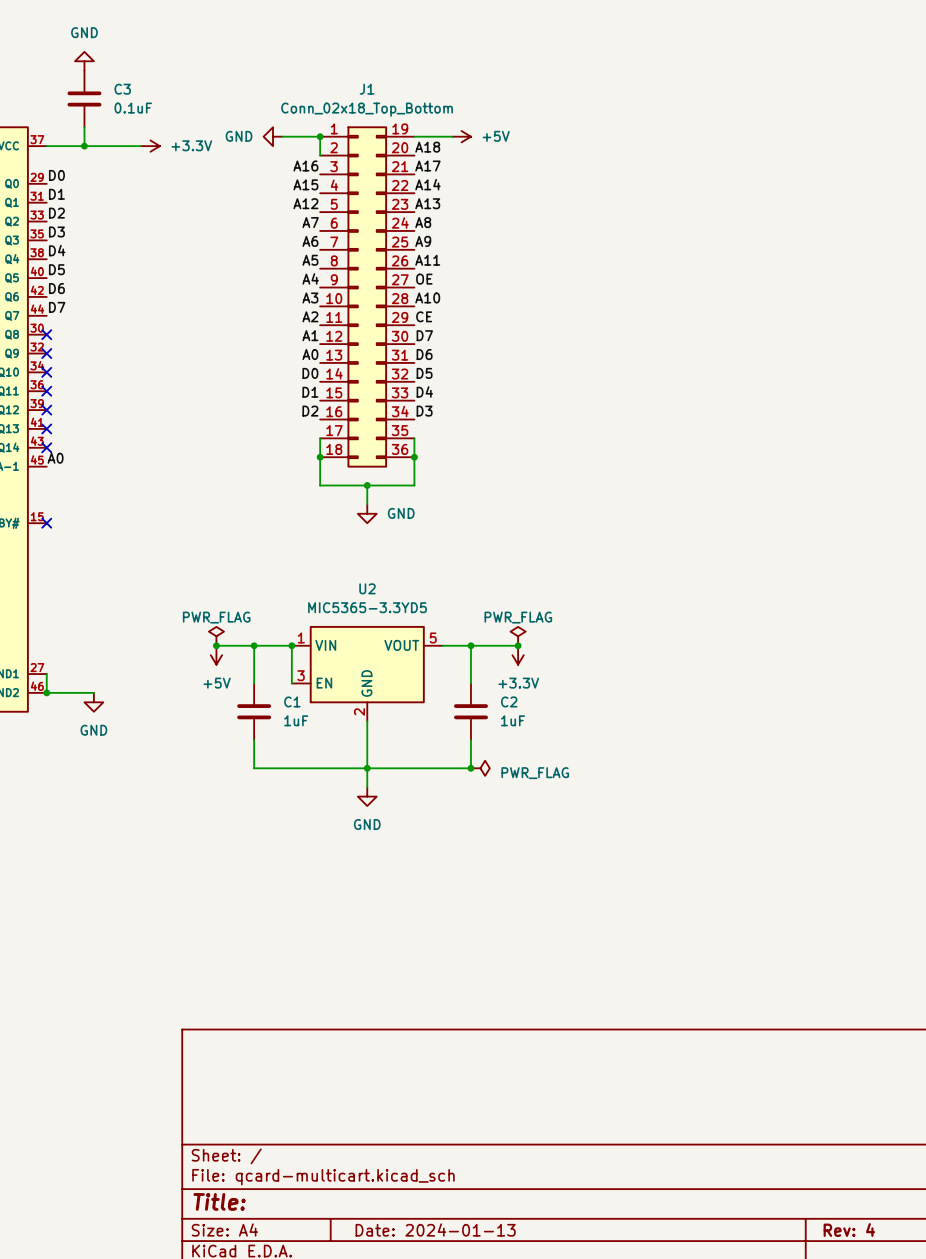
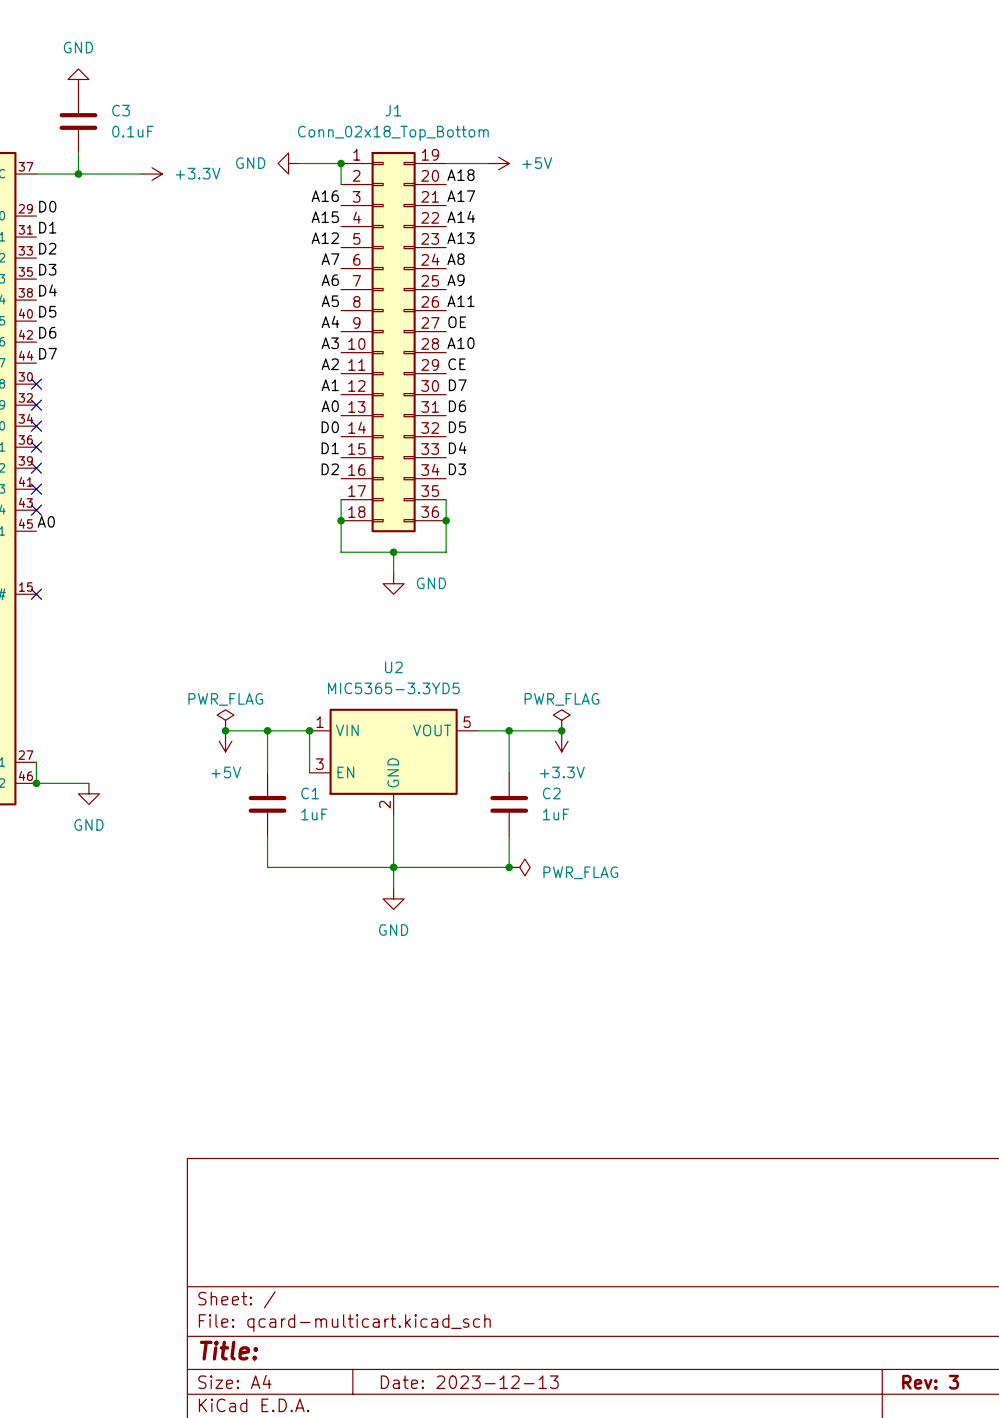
title block: Date: 2024-01-13 (435, 1230) -> Date: 2023-12-13 (469, 1382)
title block: Rev: 4 (849, 1230) -> Rev: 3 (930, 1382)

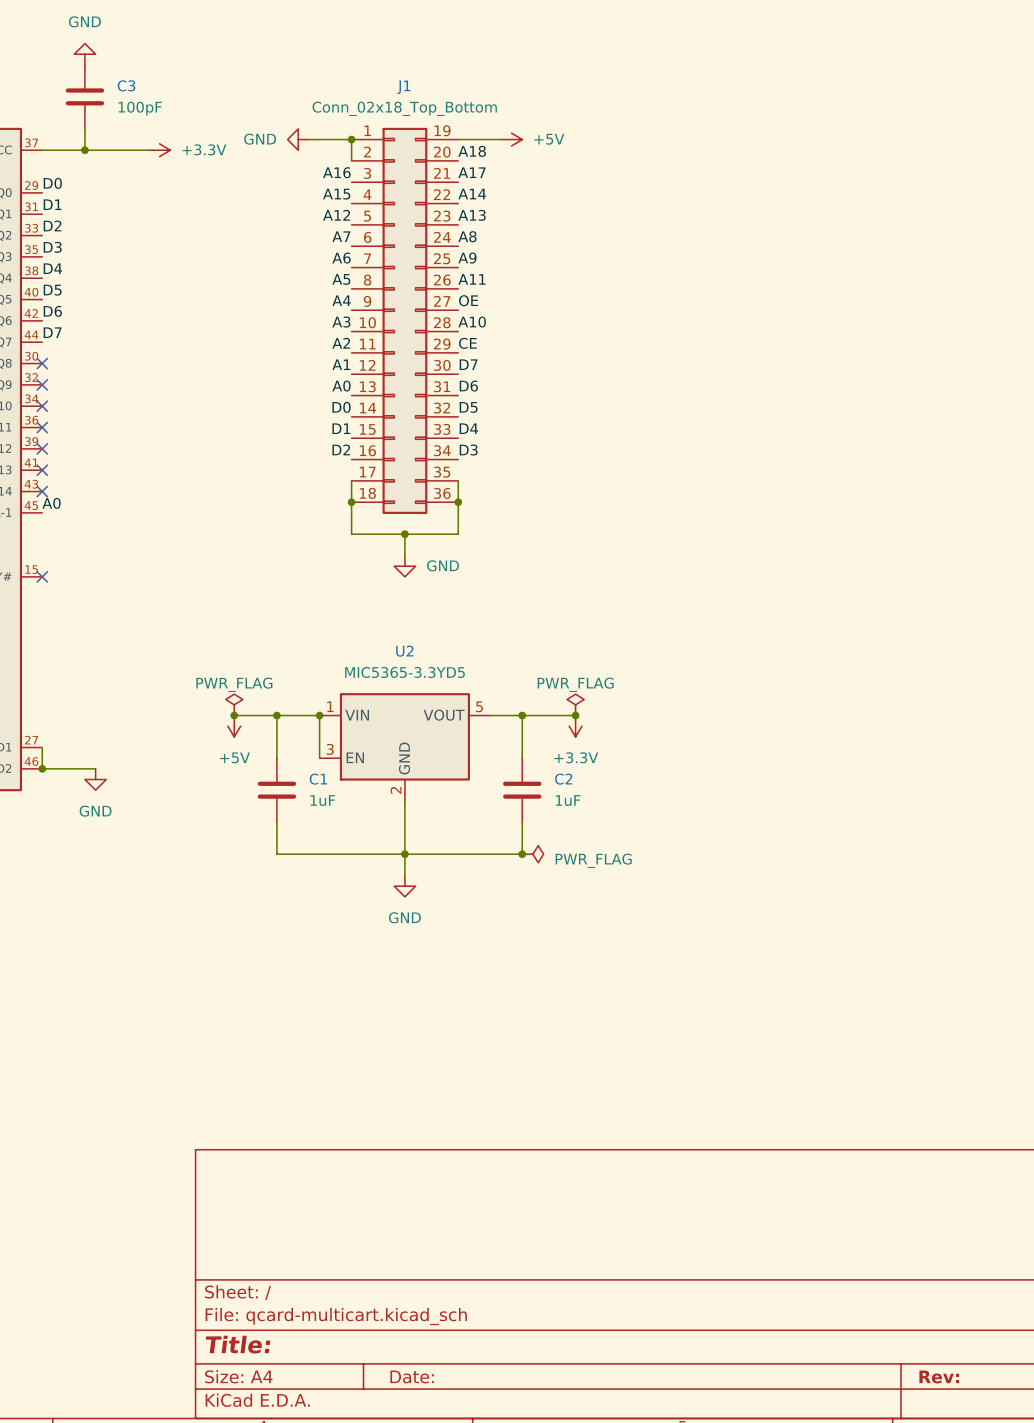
C3 value: 0.1uF (132, 131) -> 100pF (140, 108)
title block: Date: 2023-12-13 (469, 1382) -> Date: (412, 1376)
title block: Rev: 3 (930, 1382) -> Rev: (939, 1376)

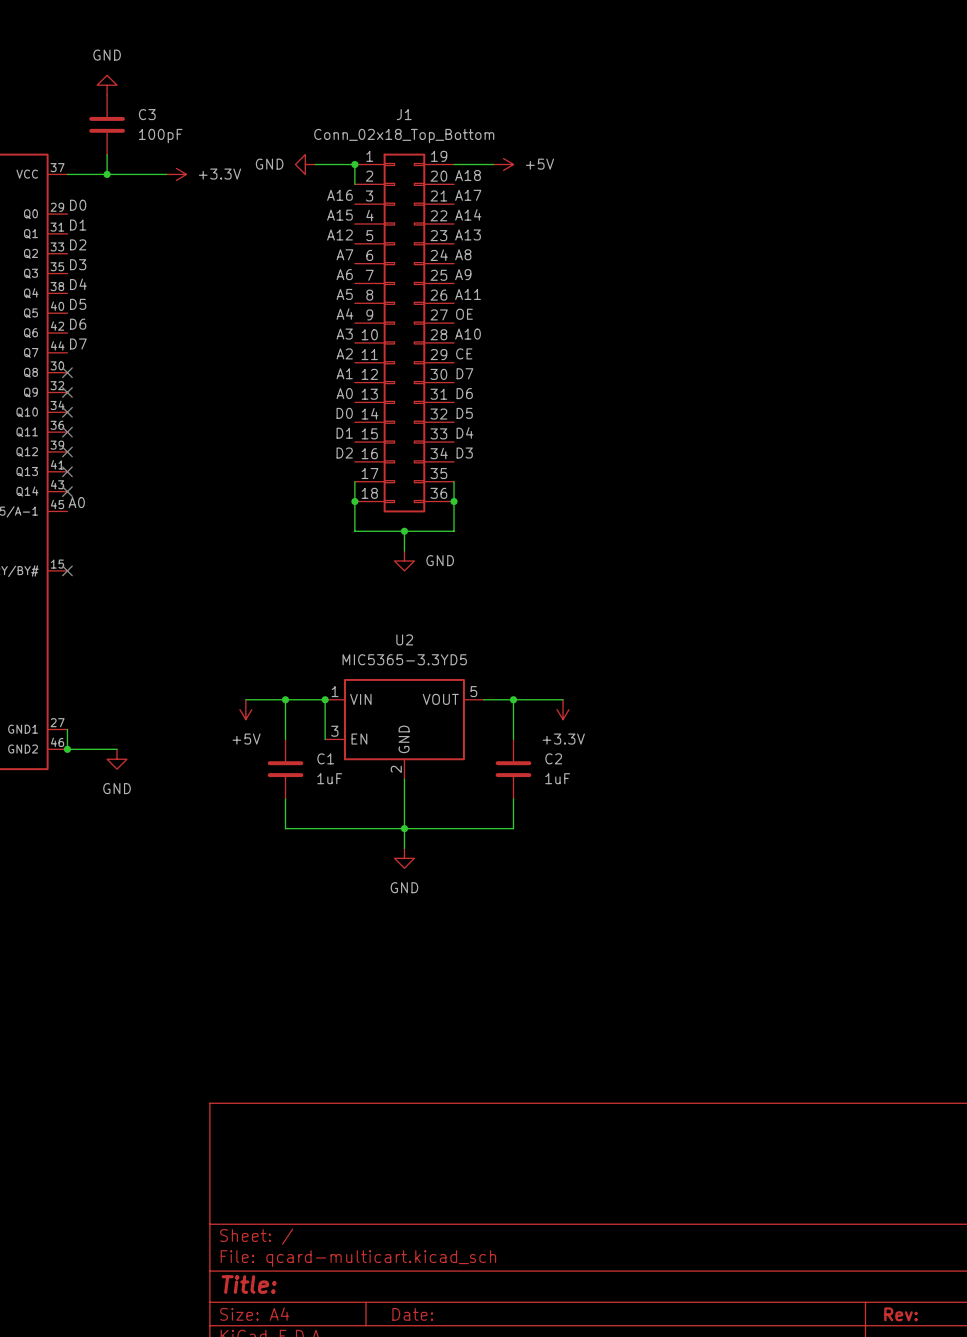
power symbol: PWR_FLAG (234, 704) -> none
power symbol: PWR_FLAG (575, 704) -> none
junction: (234, 715) -> none
junction: (575, 715) -> none
junction: (522, 854) -> none
power symbol: PWR_FLAG (532, 854) -> none

